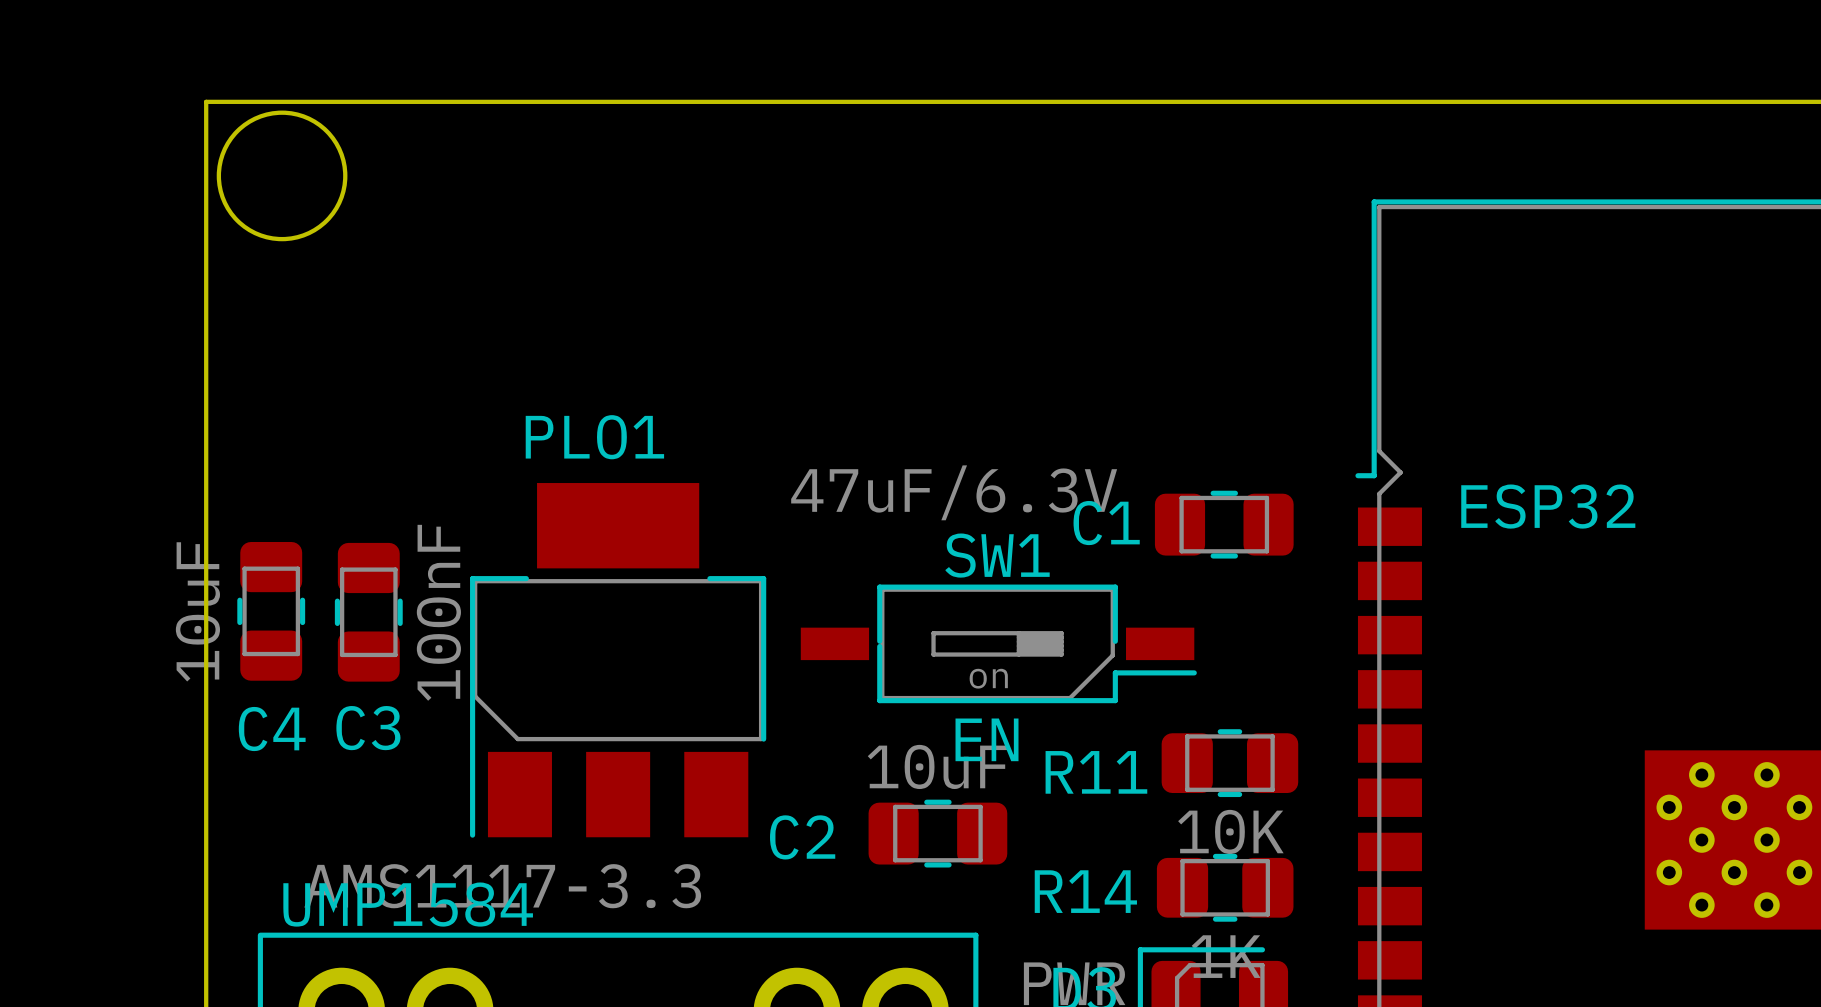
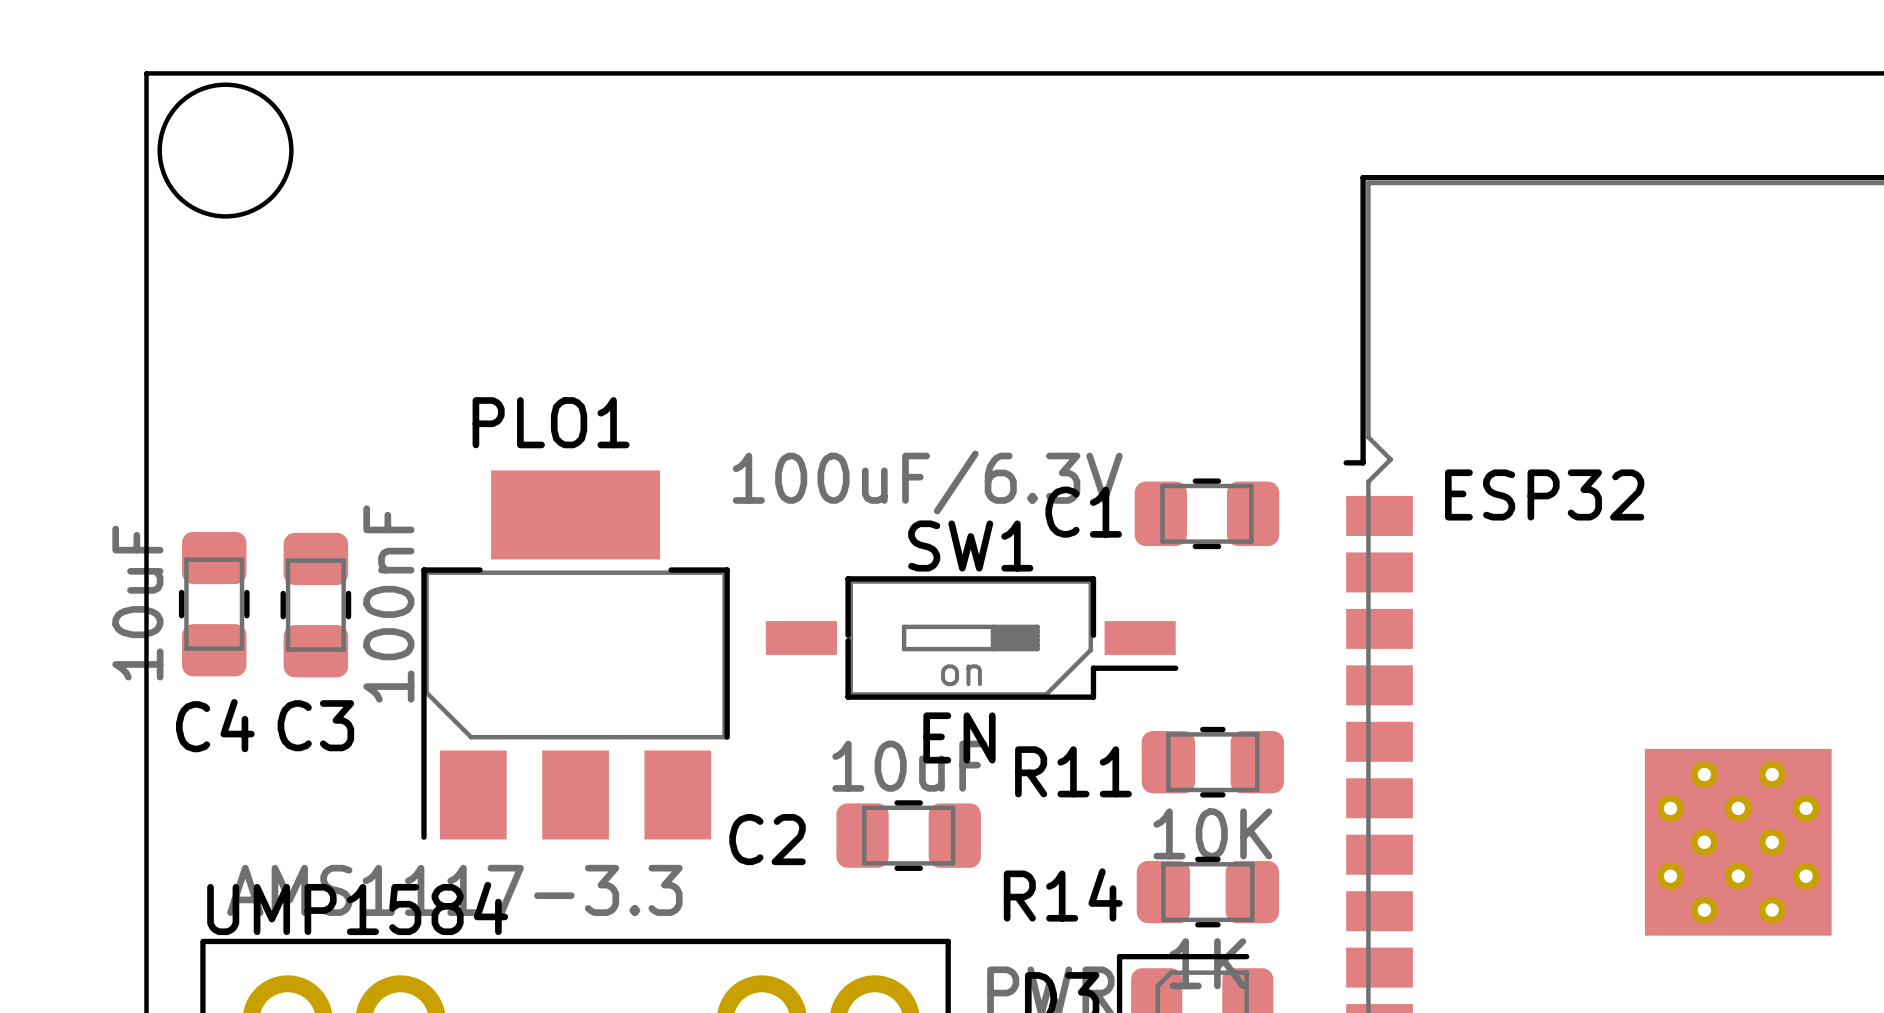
C1 value: 47uF/6.3V (954, 492) -> 100uF/6.3V (927, 482)

